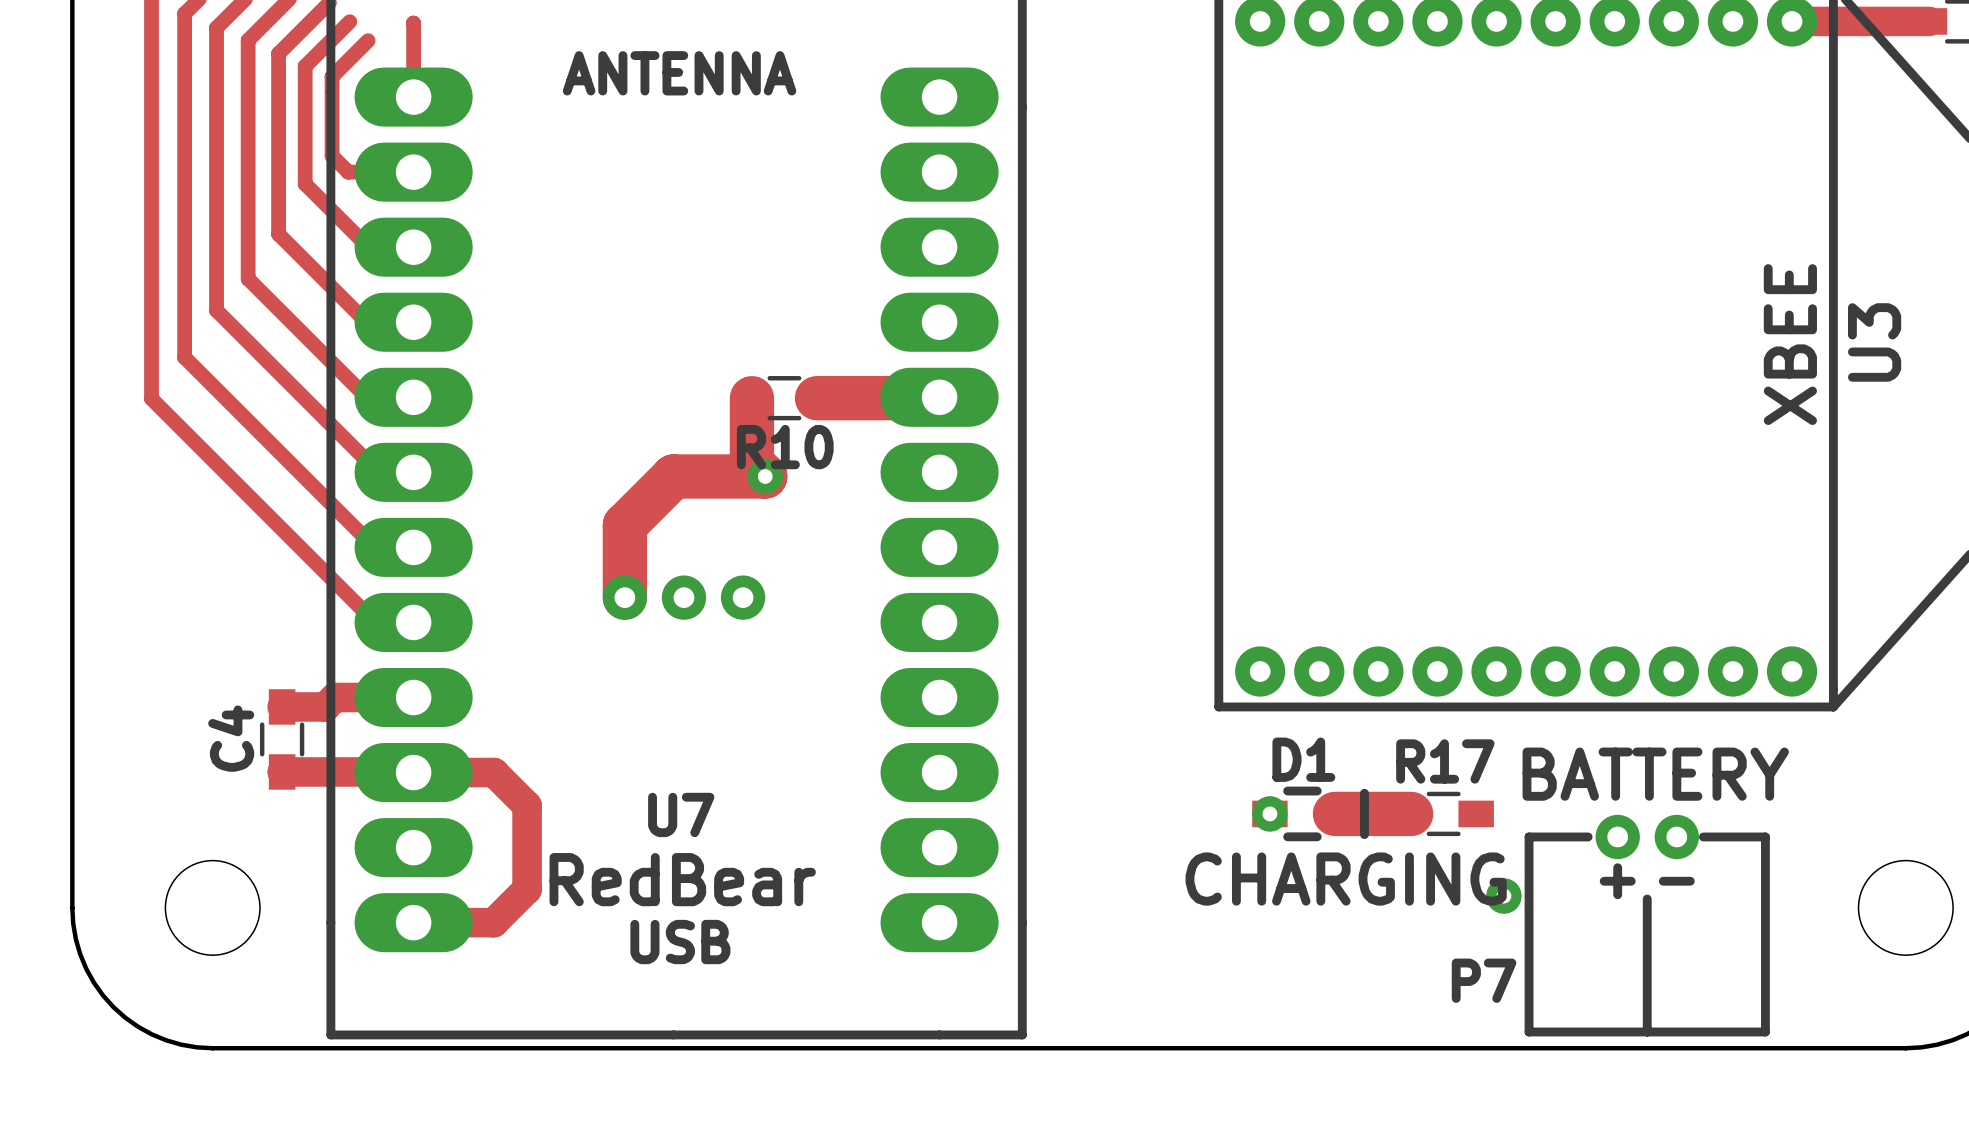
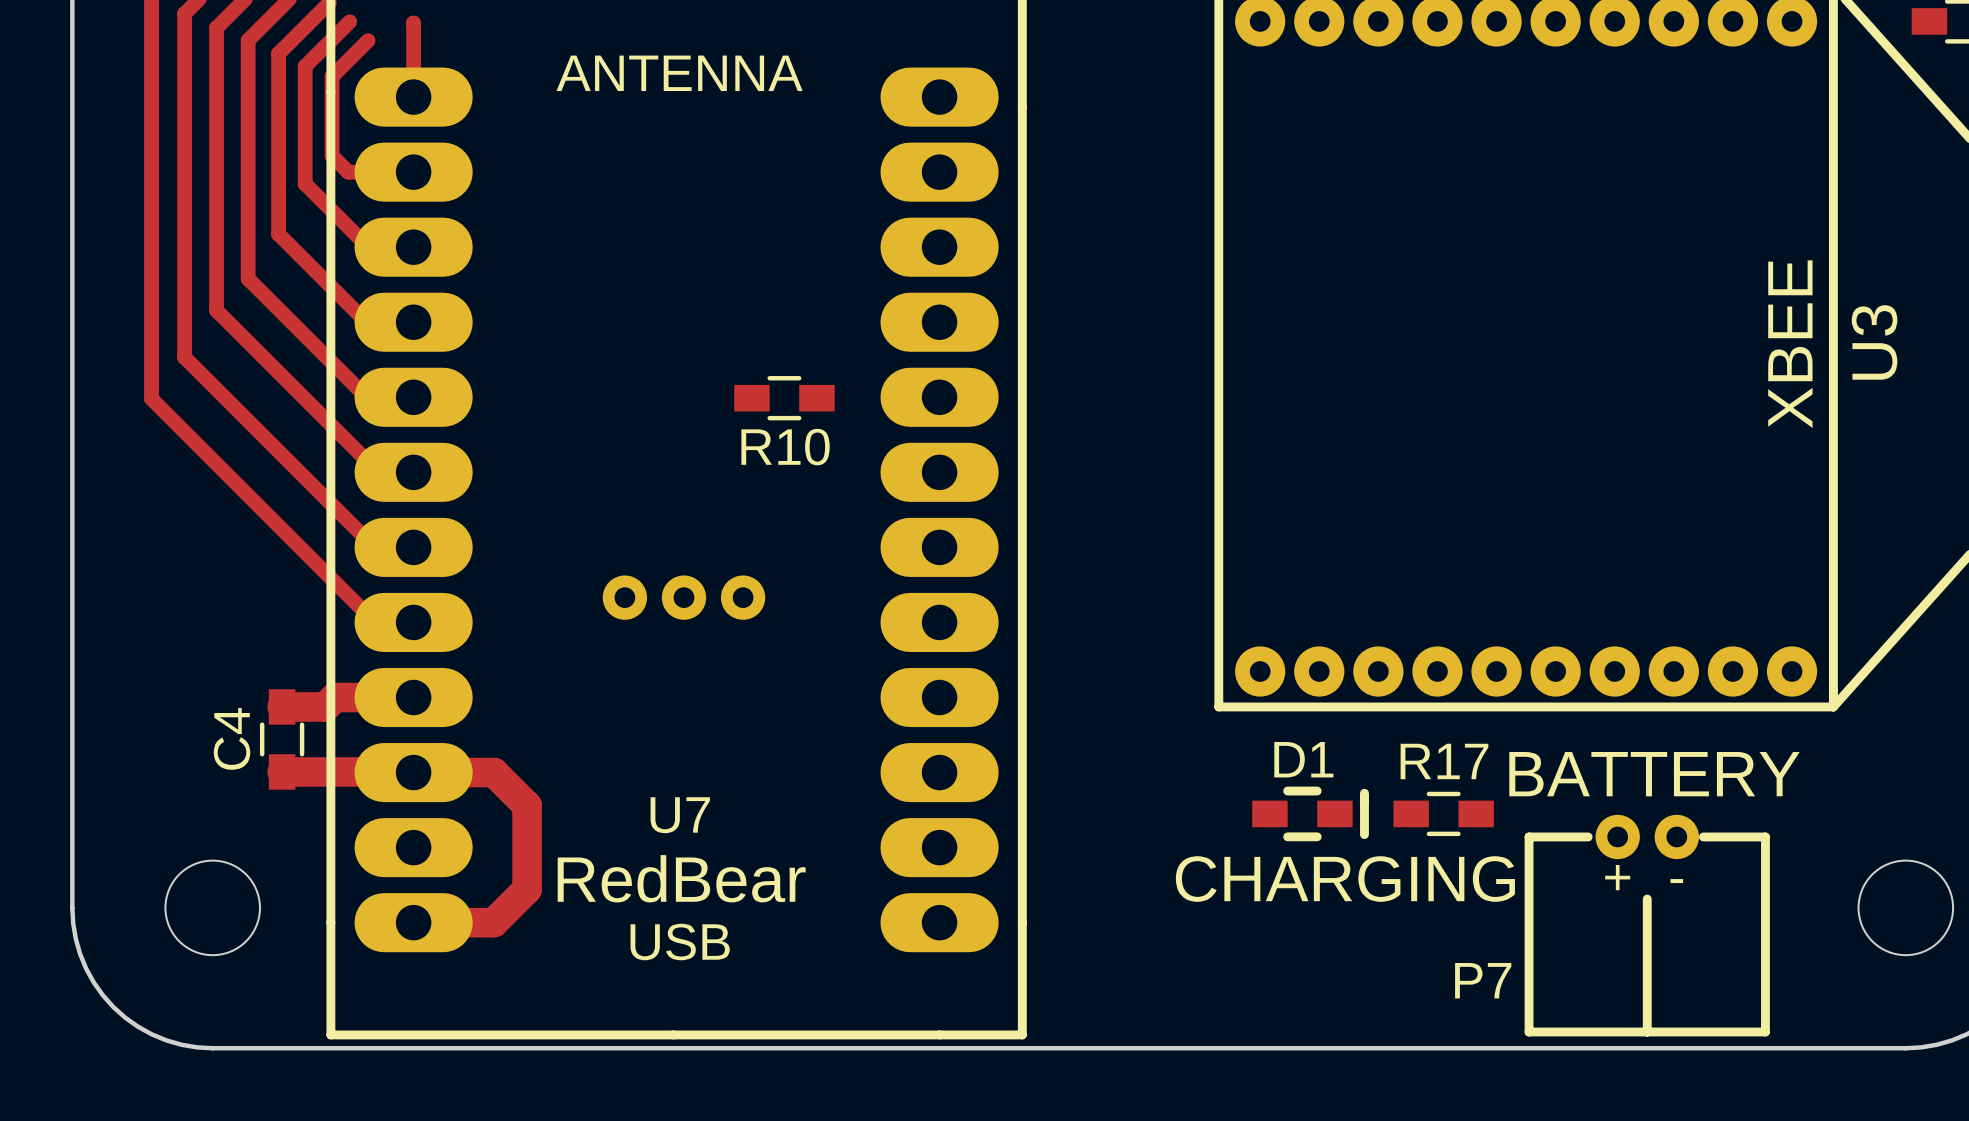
track: (1792, 21) (1929, 21) -> none
track: (939, 397) (816, 398) -> none
track: (751, 398) (751, 463) (765, 476) (673, 476) (624, 525) (624, 597) -> none
via: (765, 476) -> none
via: (1269, 813) -> none
track: (1334, 813) (1411, 813) -> none
via: (1503, 896) -> none

